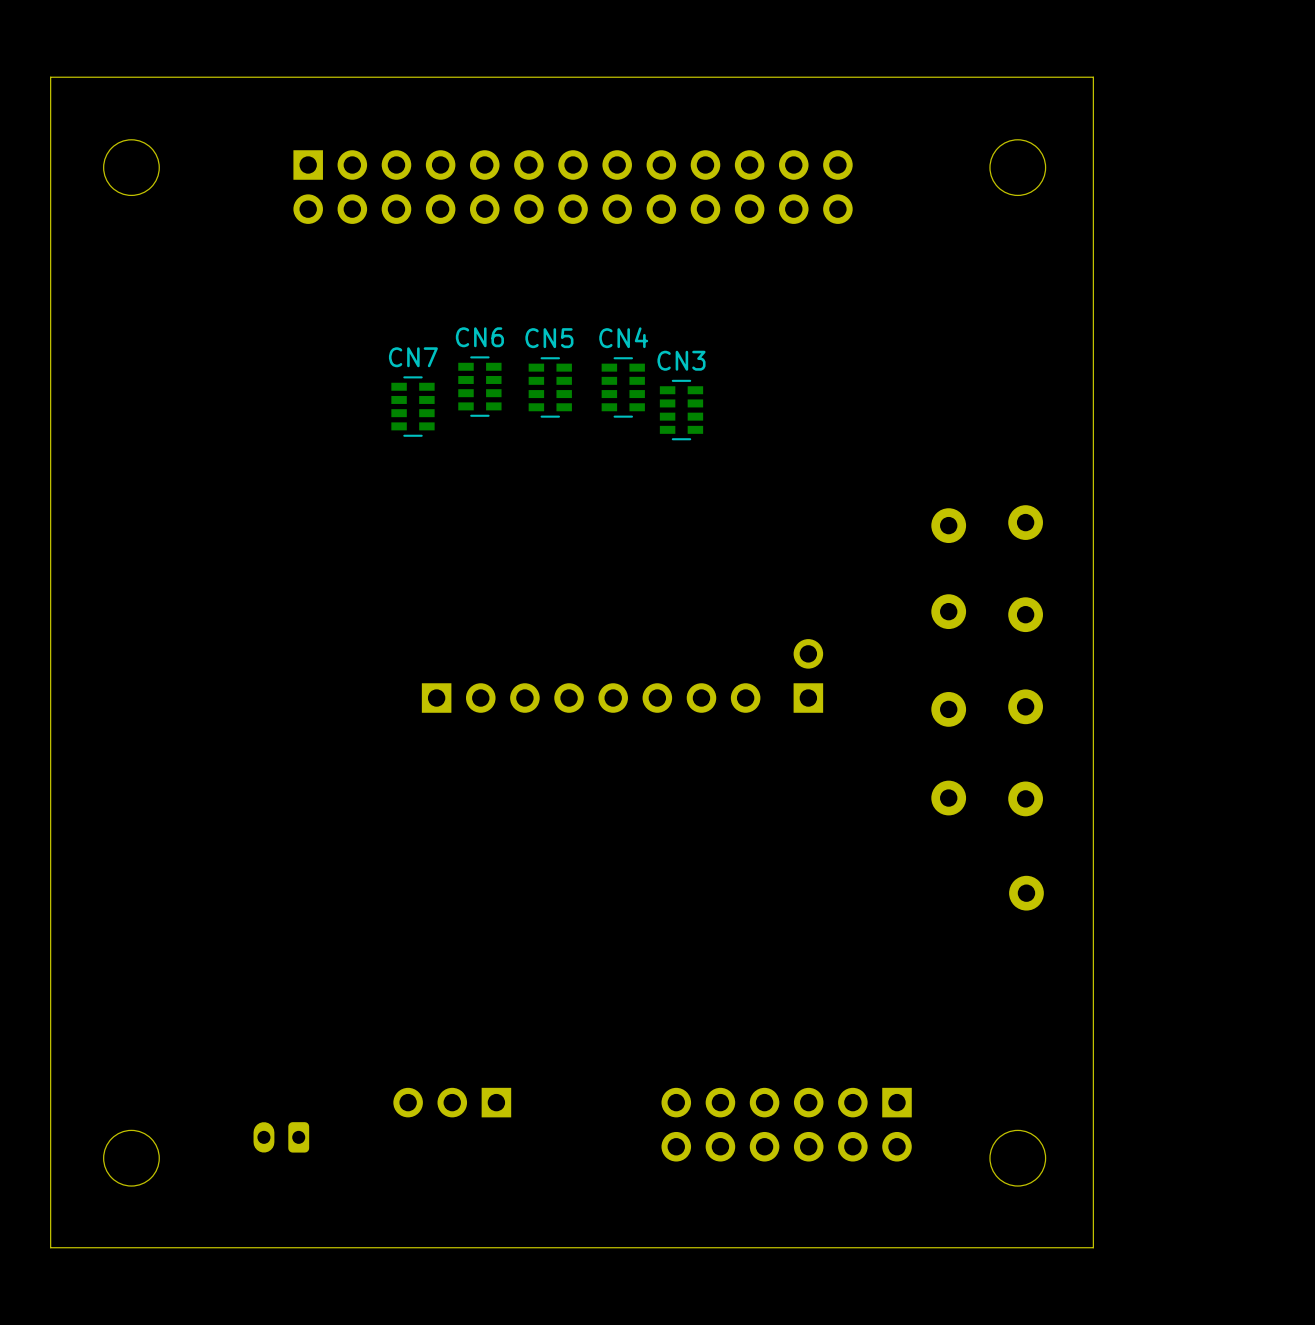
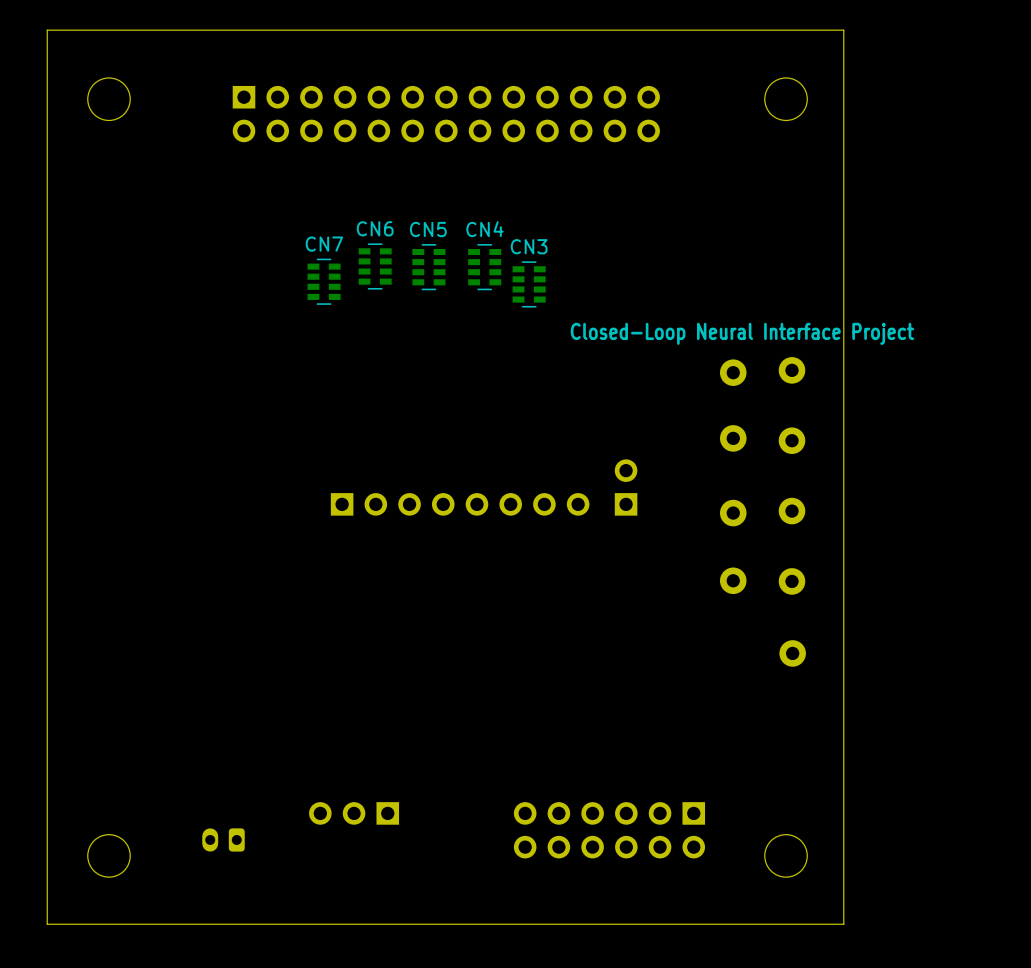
text: none -> Closed-Loop Neural Interface Project (742, 333)

